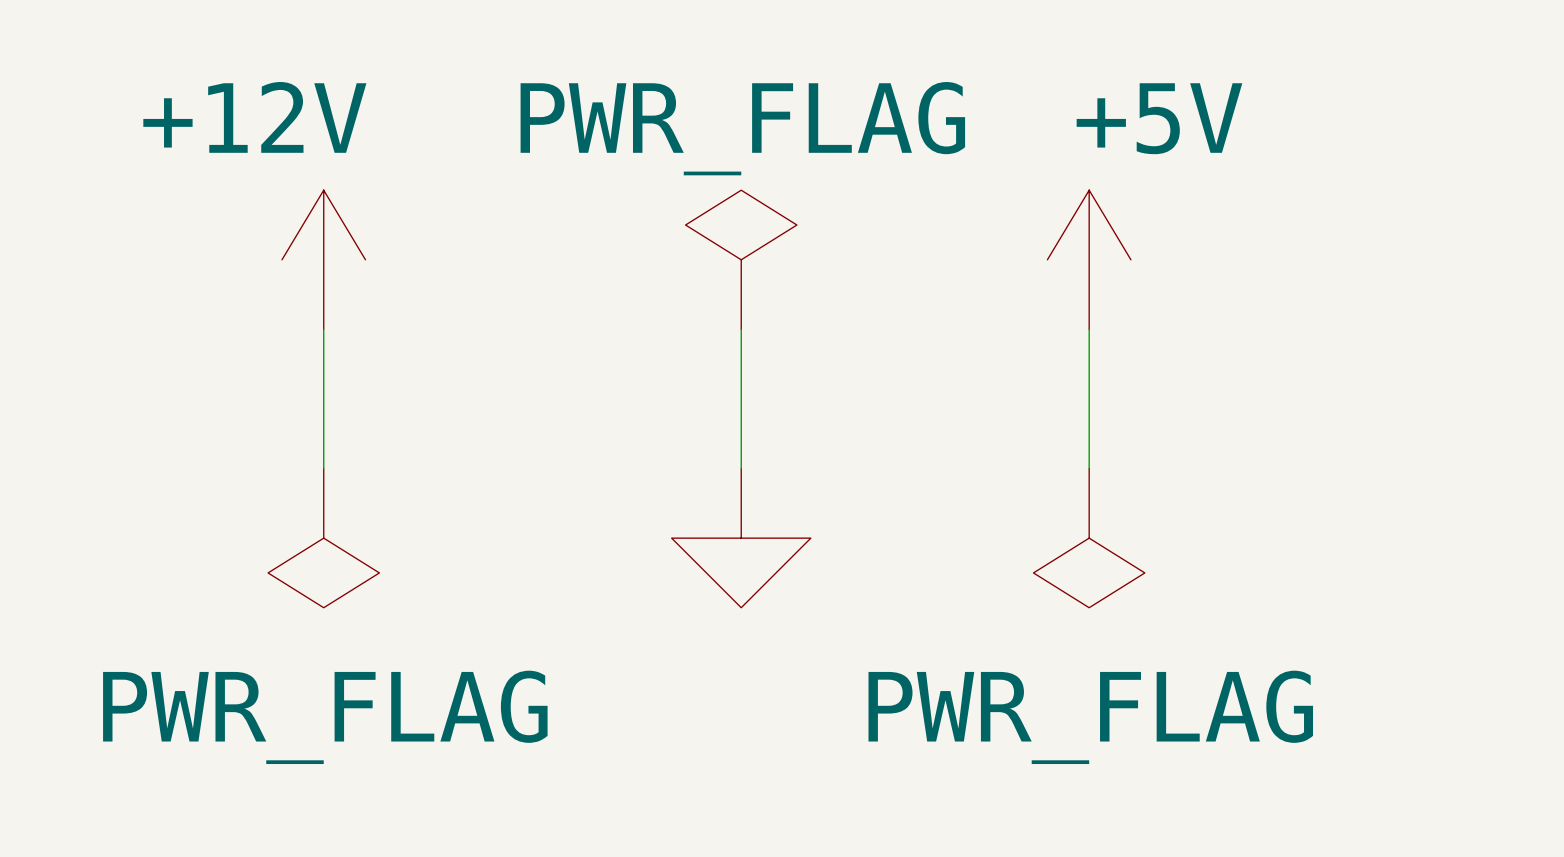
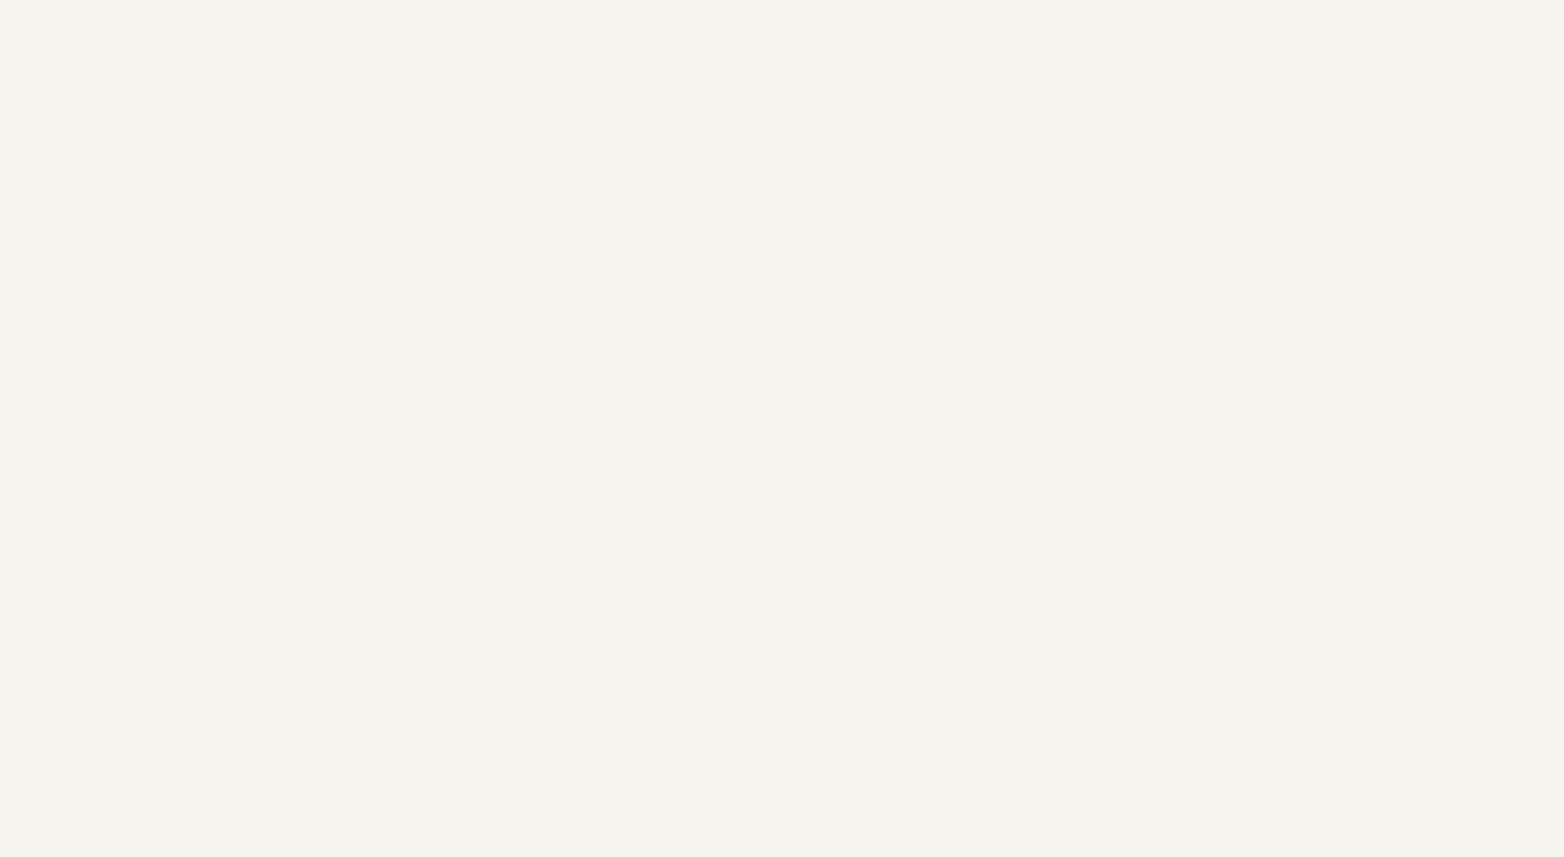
power symbol: +12V (323, 259) -> none
power symbol: PWR_FLAG (741, 259) -> none
power symbol: +5V (1089, 259) -> none
wire: (323, 329) (323, 468) -> none
wire: (741, 329) (741, 468) -> none
wire: (1089, 329) (1089, 468) -> none
power symbol: PWR_FLAG (323, 538) -> none
power symbol: (741, 538) -> none
power symbol: PWR_FLAG (1089, 538) -> none

